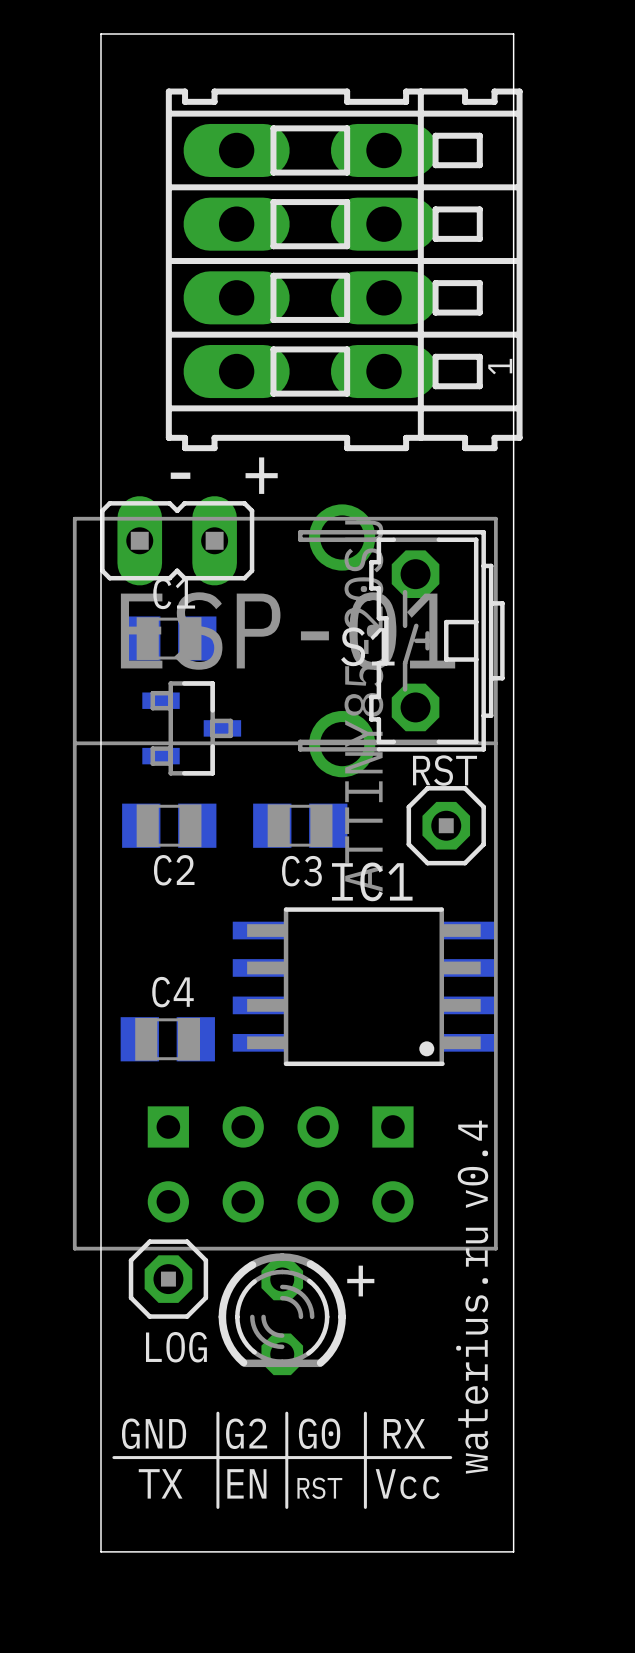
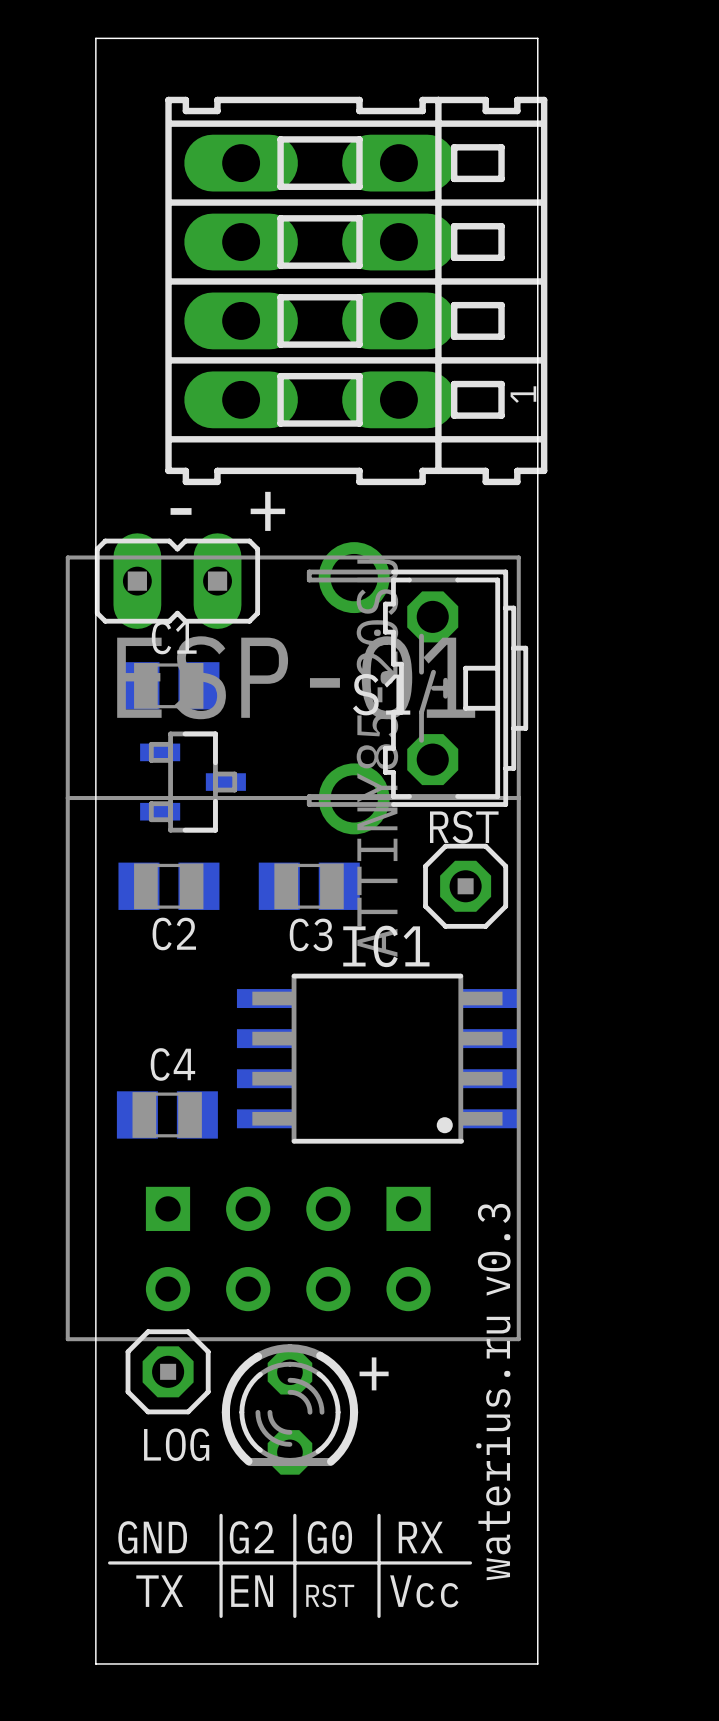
text: v0.4 (472, 1164) -> v0.3 (494, 1249)

